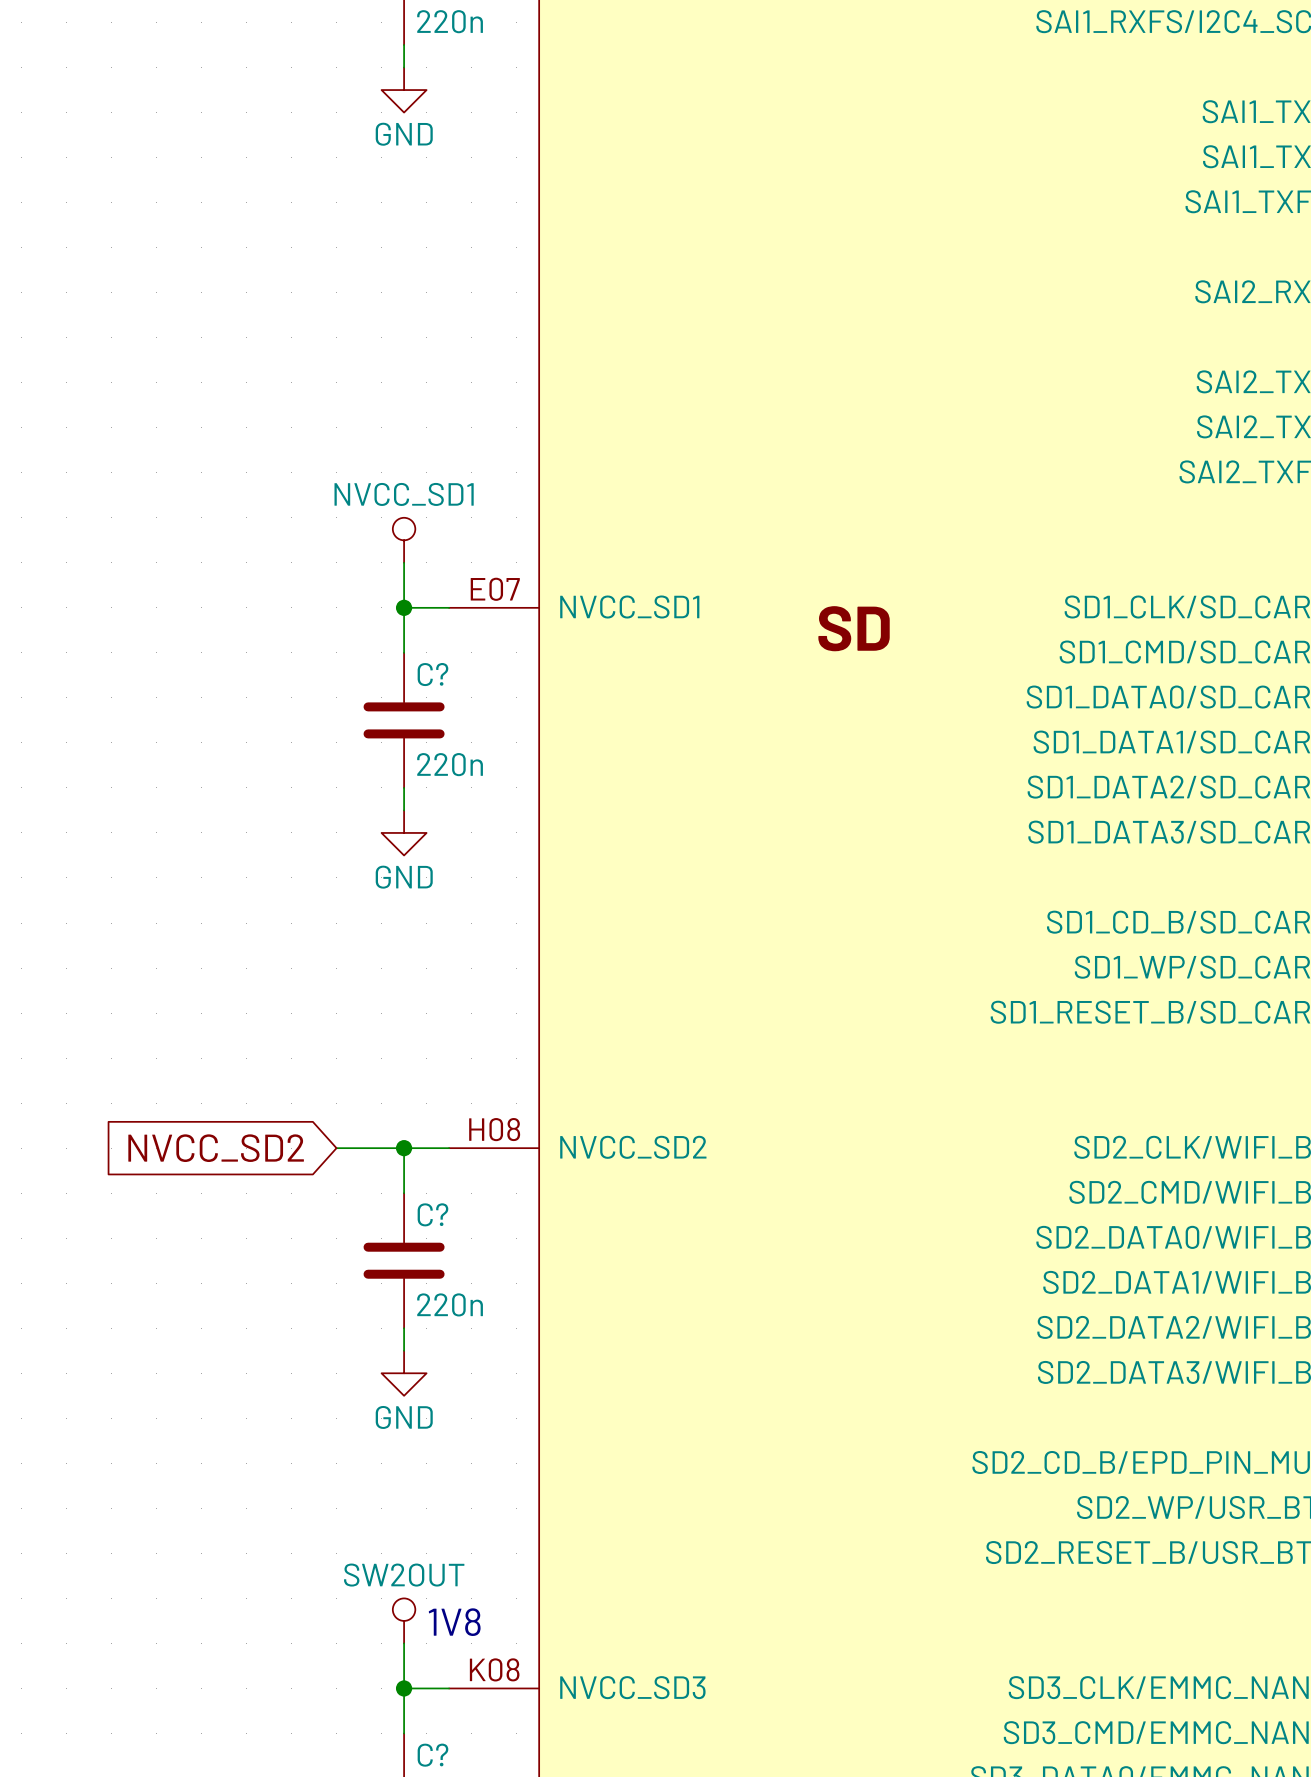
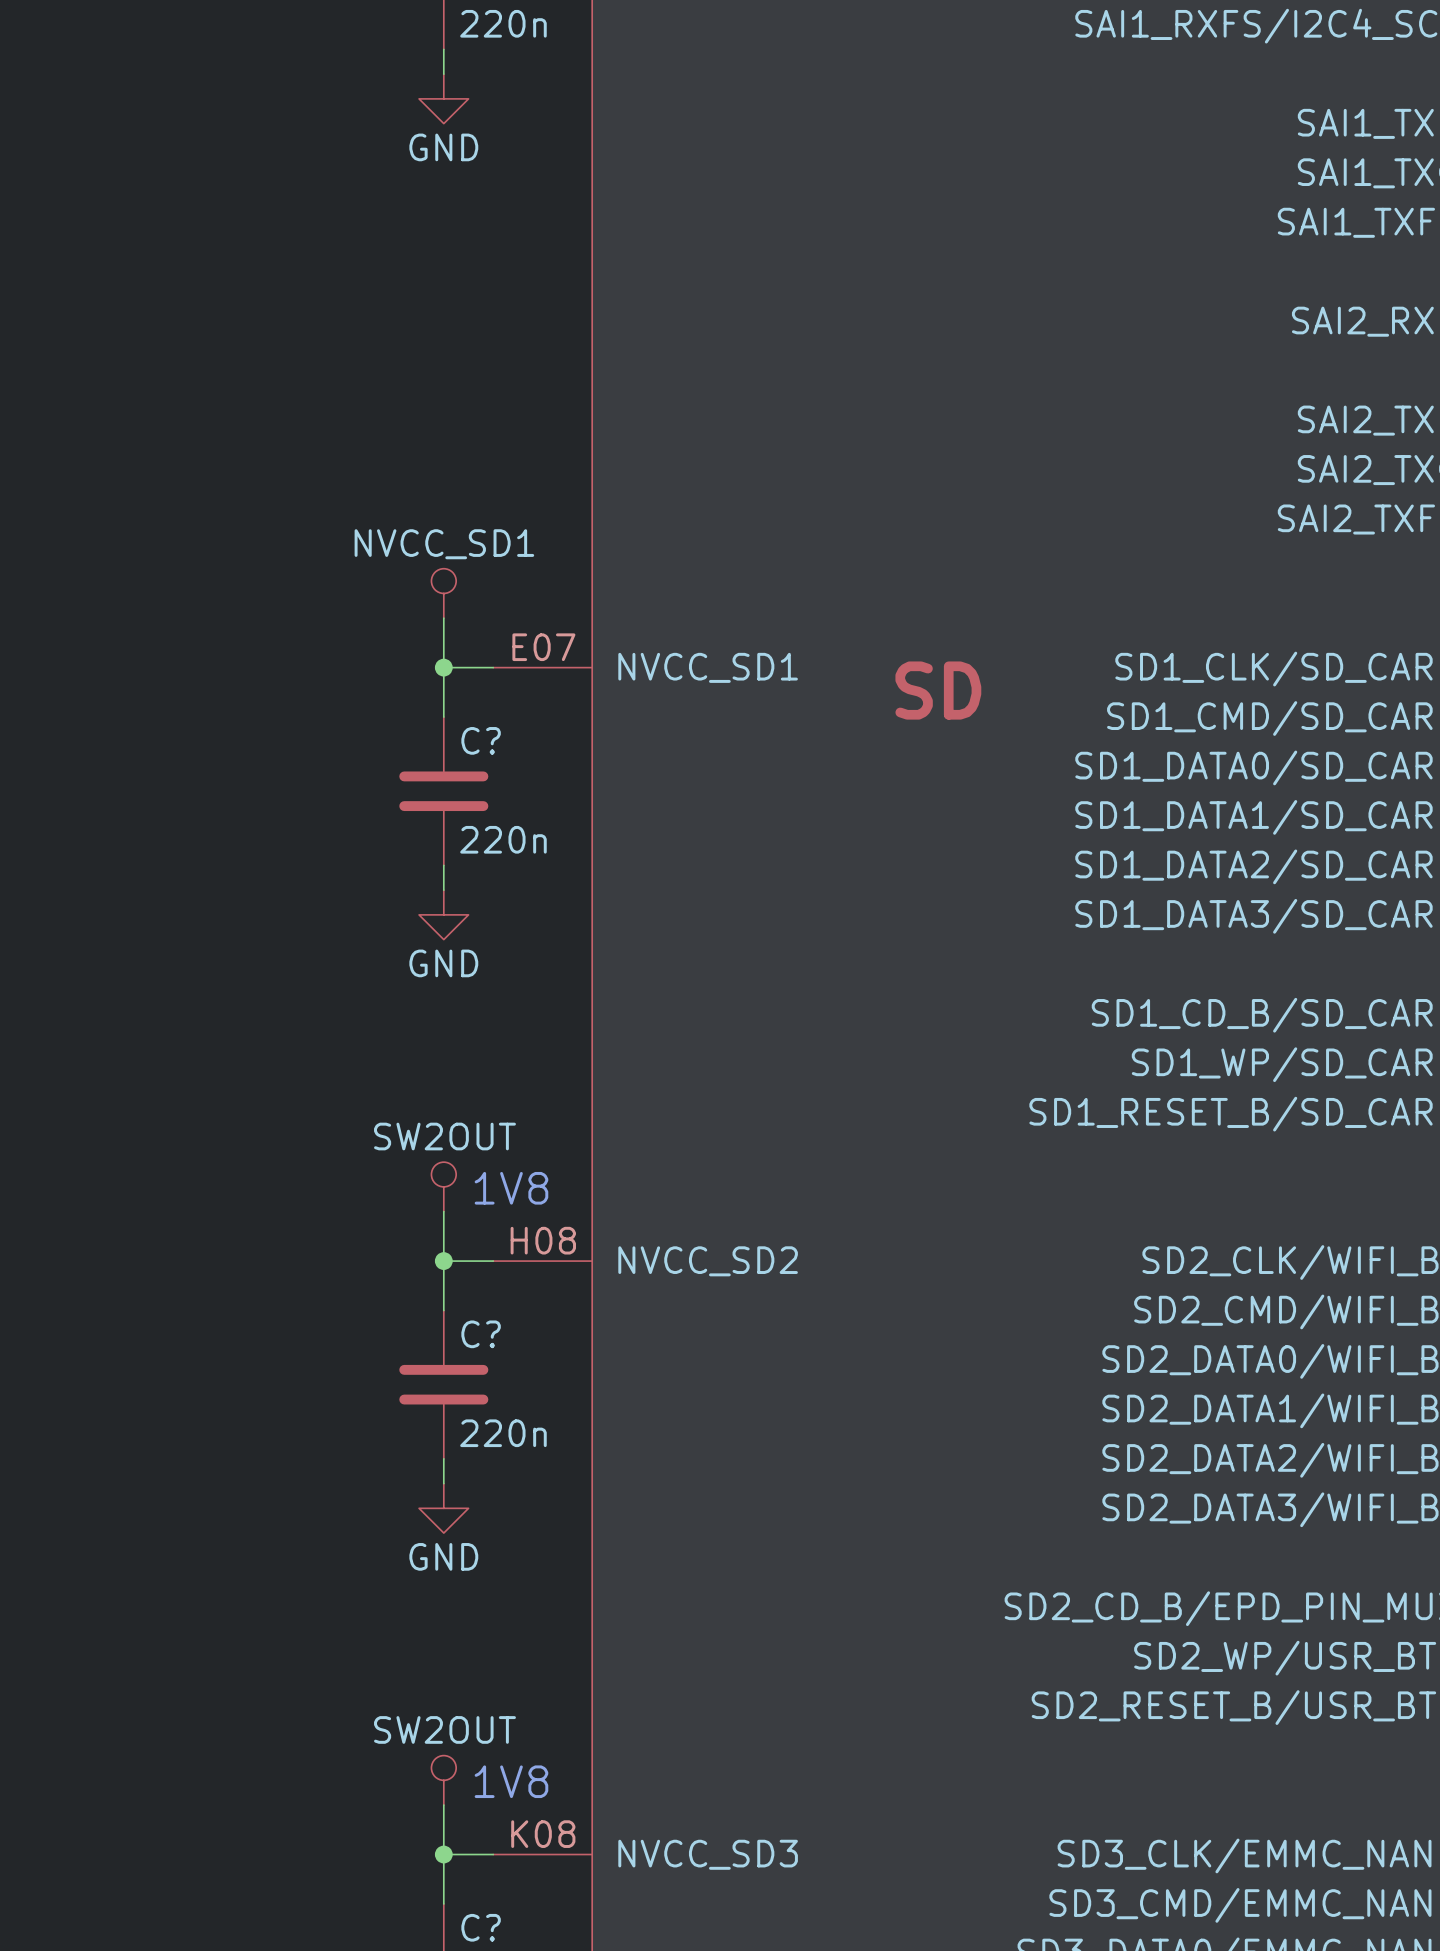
power symbol: none -> SW2OUT (443, 1186)
text: none -> 1V8 (511, 1188)
global label: NVCC_SD2 (216, 1148) -> none
wire: (336, 1148) (404, 1148) -> (443, 1211) (443, 1261)

